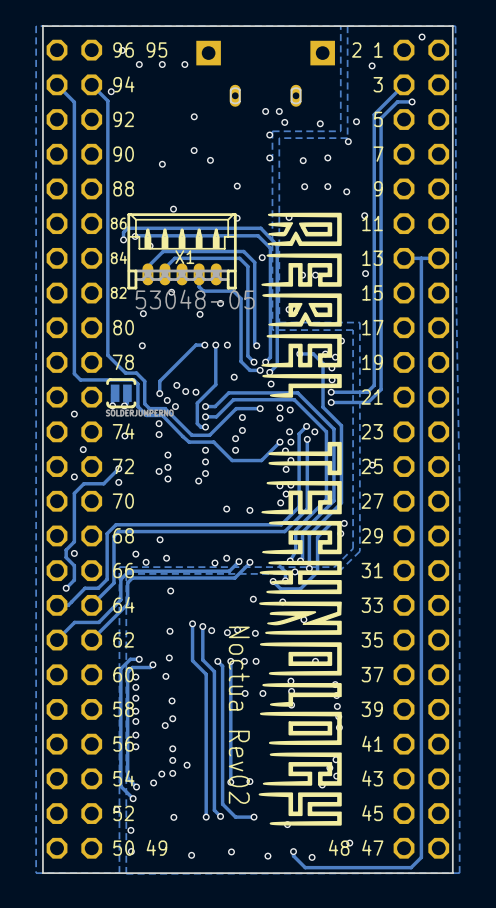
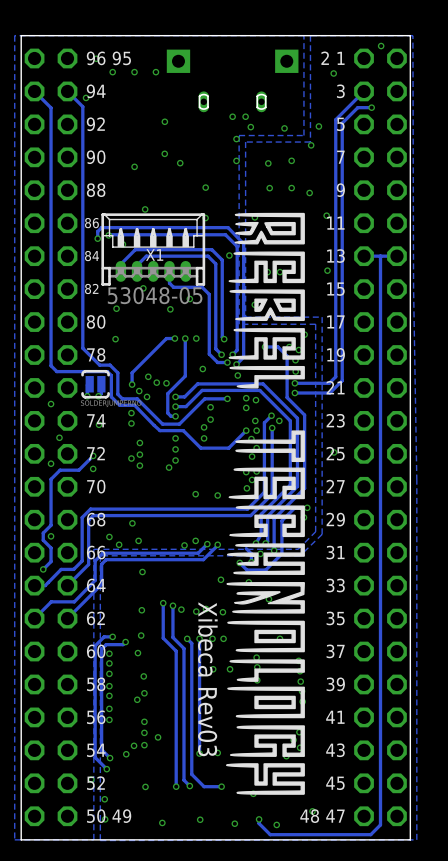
text: Noctua Rev02 (239, 715) -> Xibeca Rev03 (207, 679)

